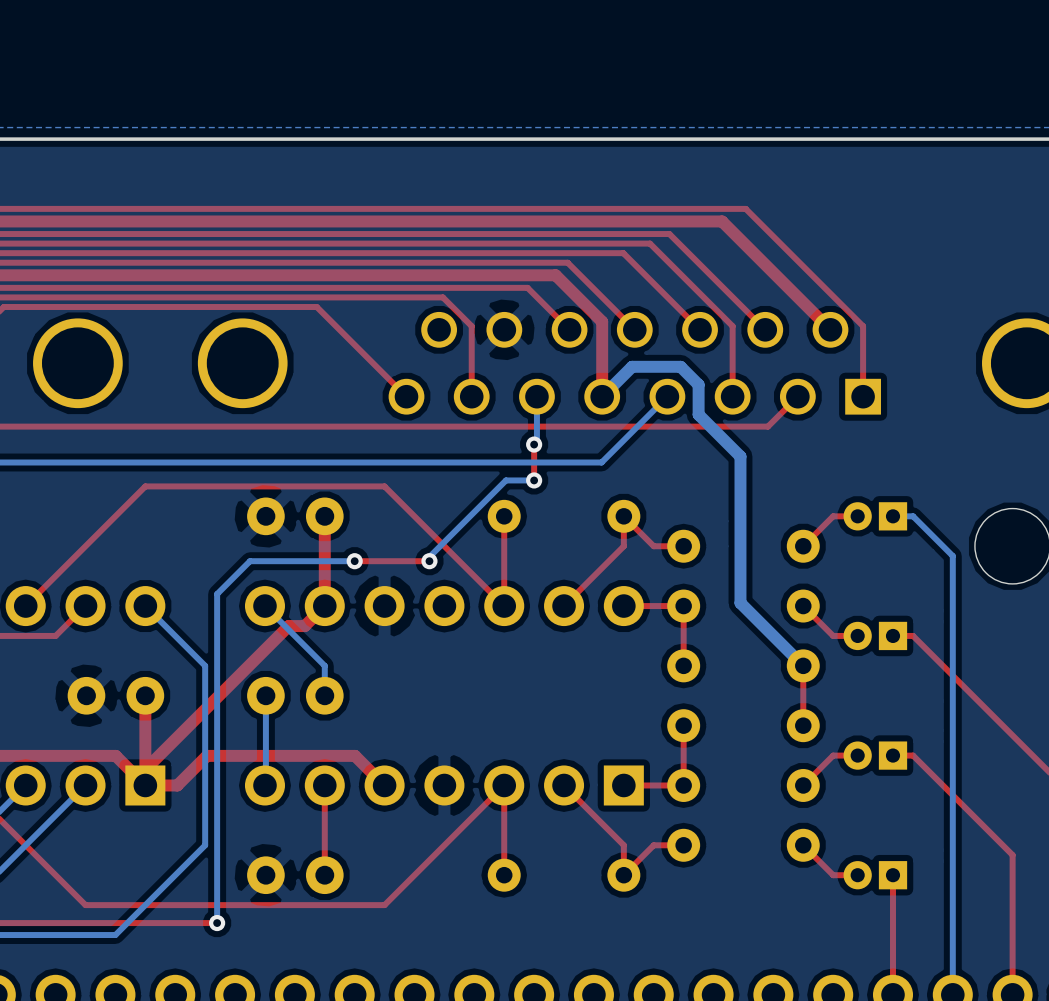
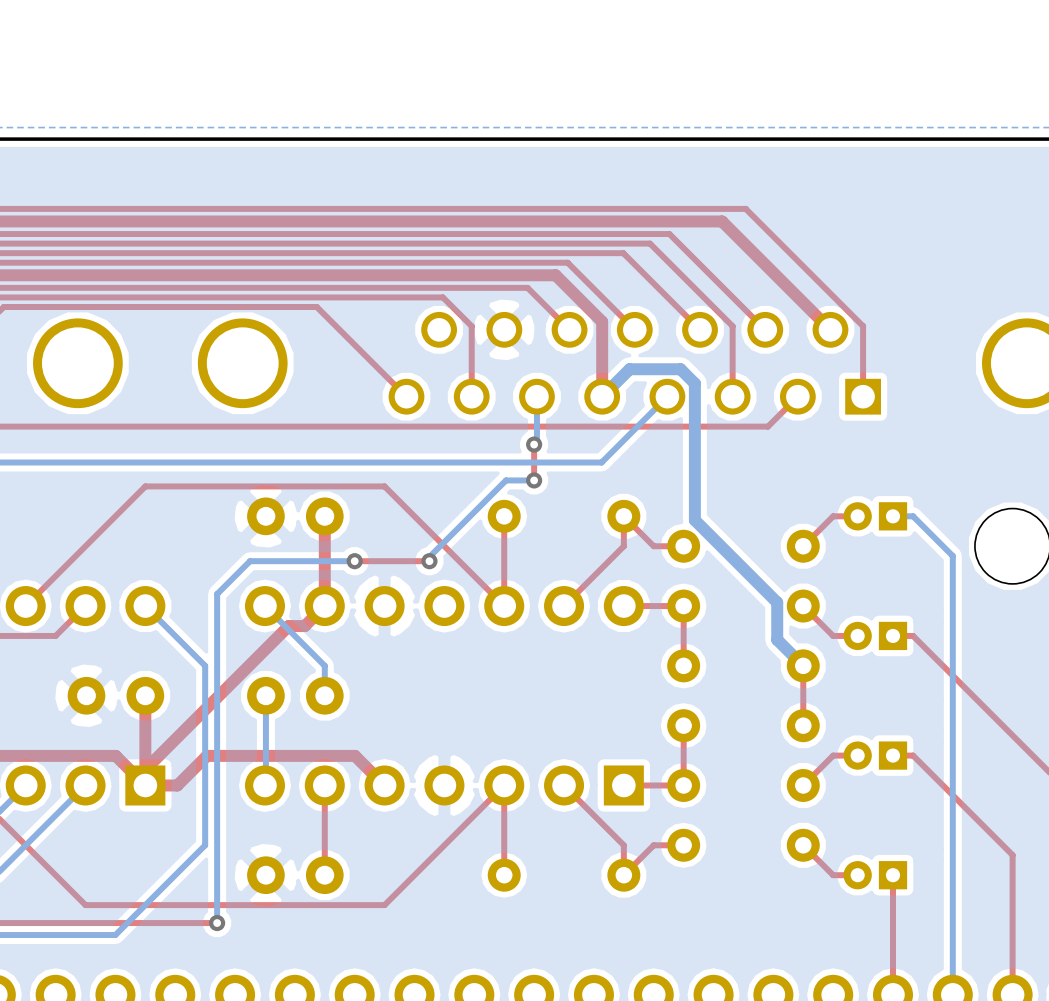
bottom track: (629, 369) (632, 366) (680, 366) (698, 384) (698, 414) (740, 456) (740, 603) (777, 639) -> (629, 369) (680, 369) (694, 383) (694, 520) (777, 602) (777, 639)

